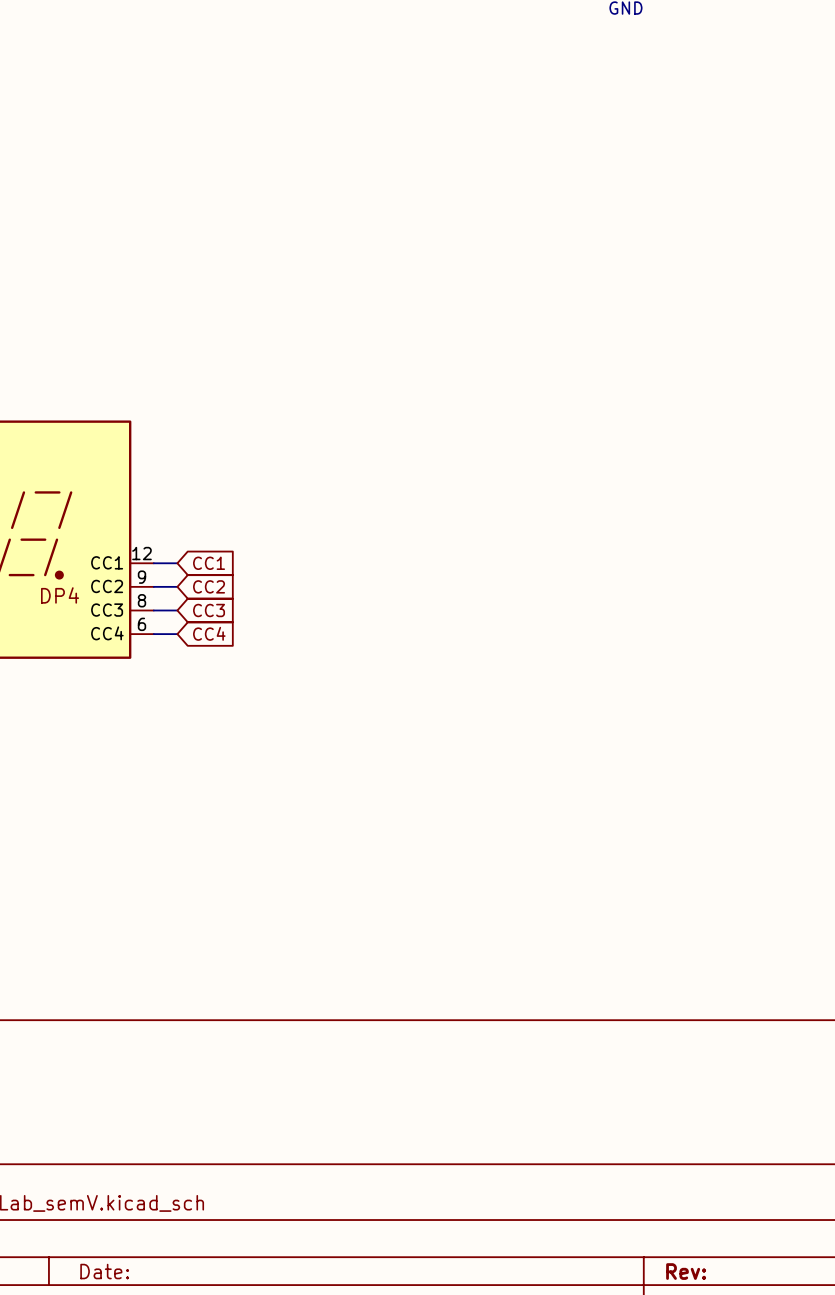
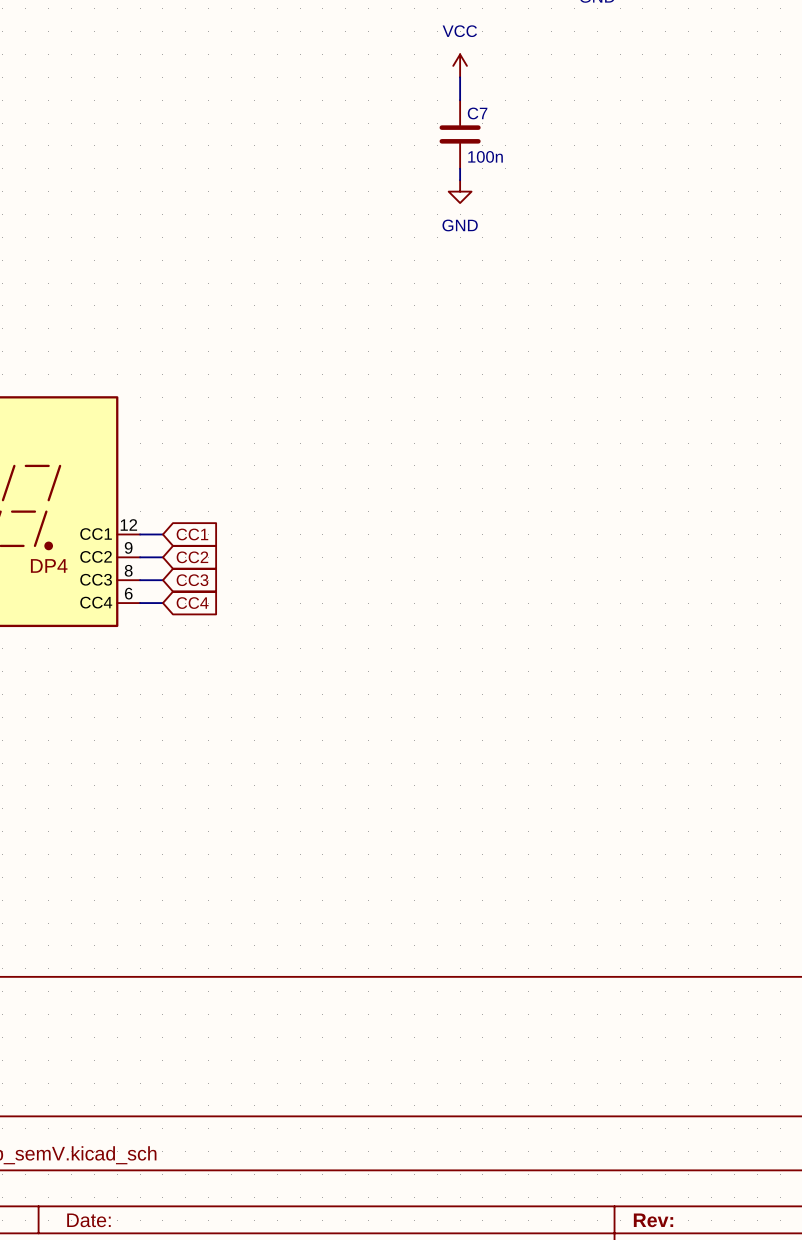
power symbol: none -> VCC (460, 65)
wire: none -> (460, 77) (460, 100)
C7: none -> 100n (460, 134)
wire: none -> (460, 168) (460, 180)
power symbol: none -> GND (460, 191)

